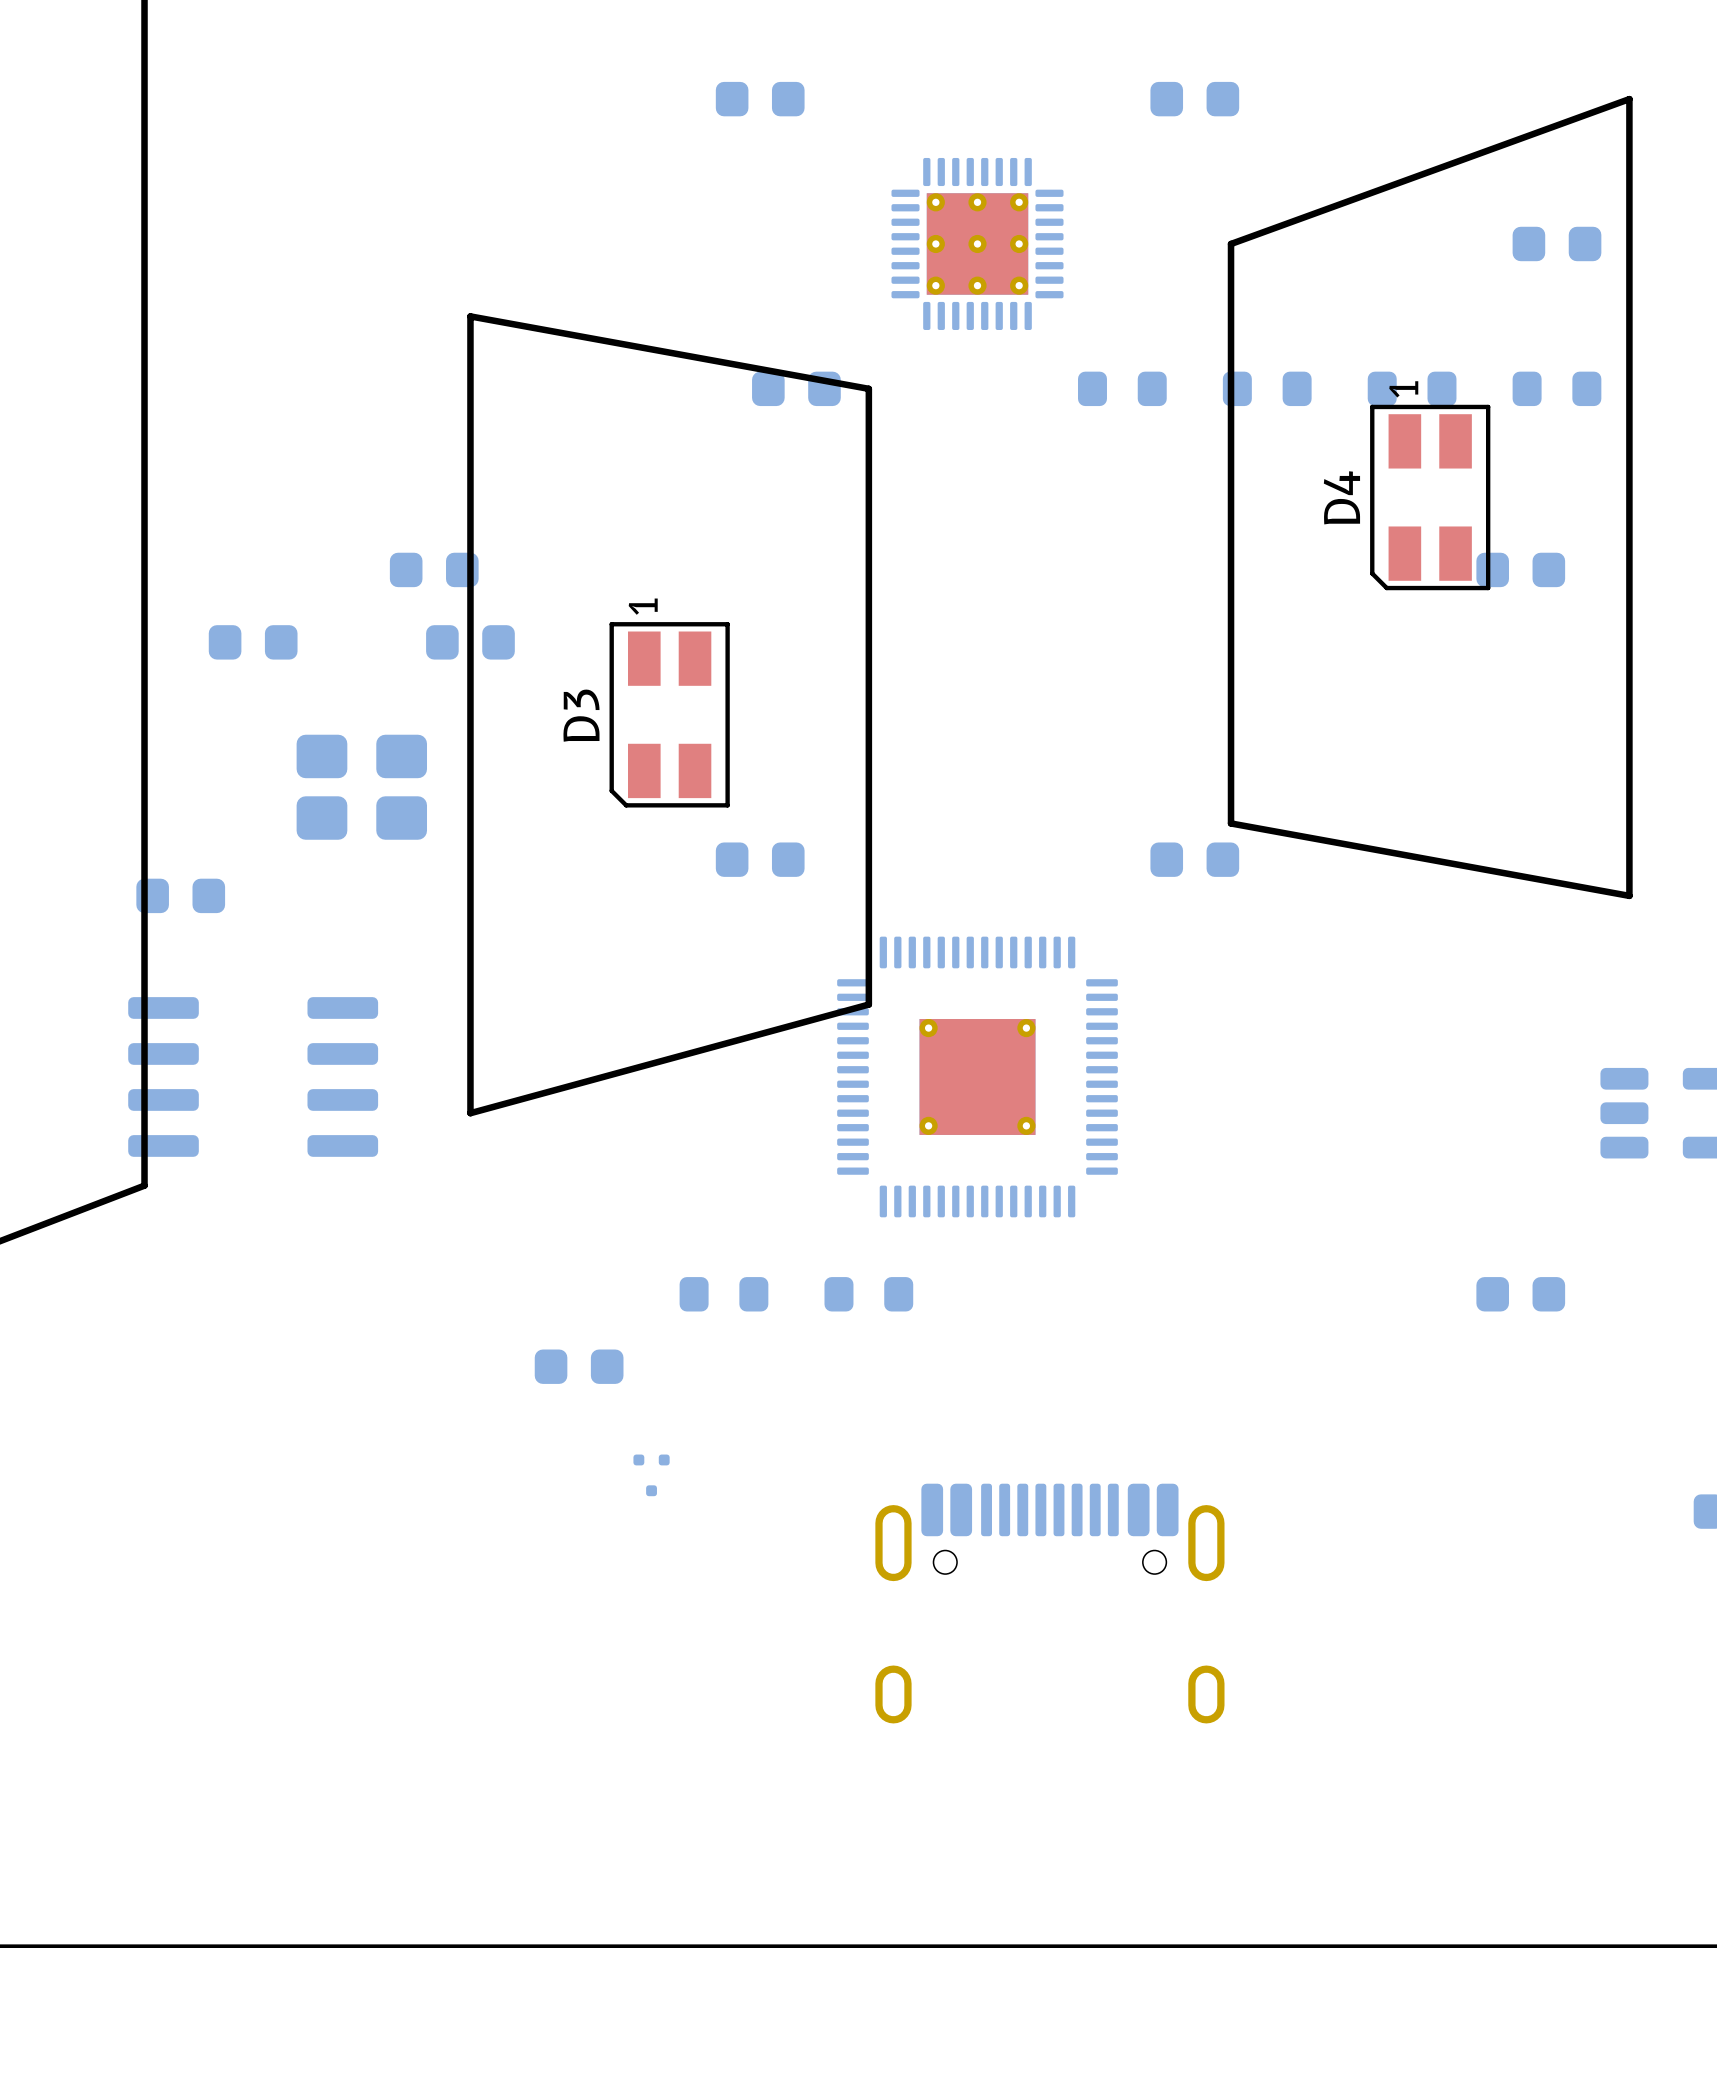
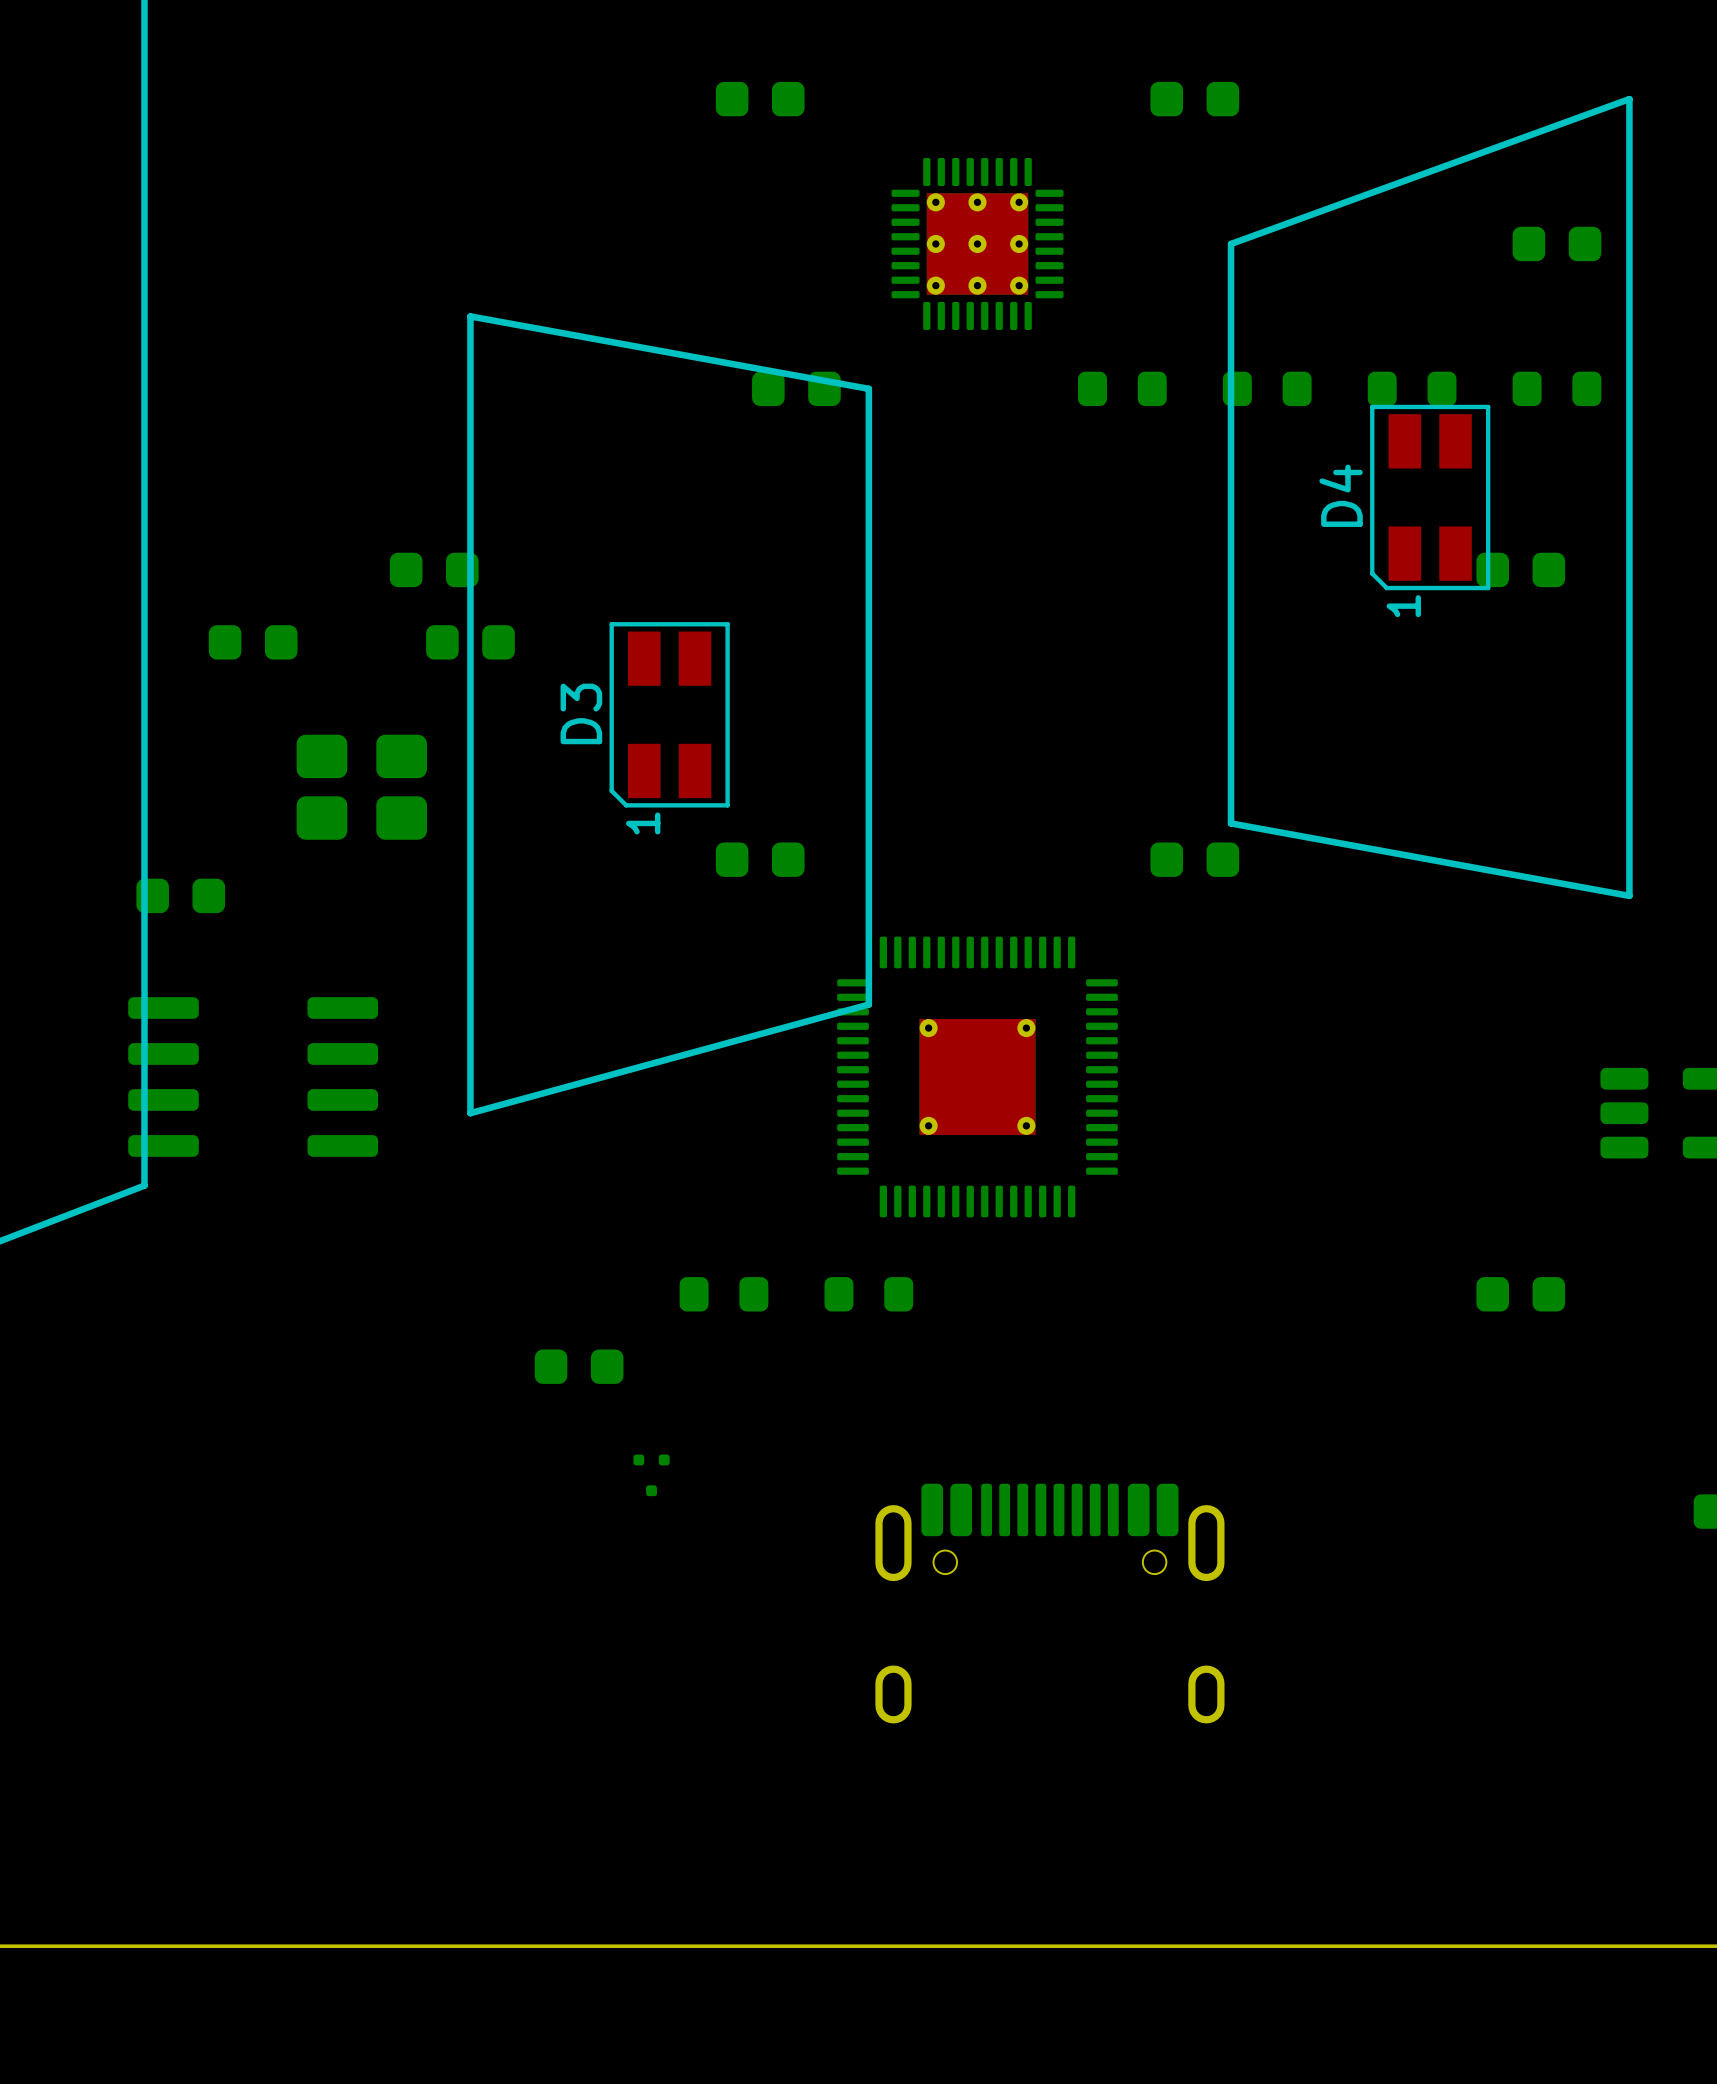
D4 text position: 1 (1403, 389) -> 1 (1403, 606)
D3 text position: 1 (643, 606) -> 1 (643, 823)

